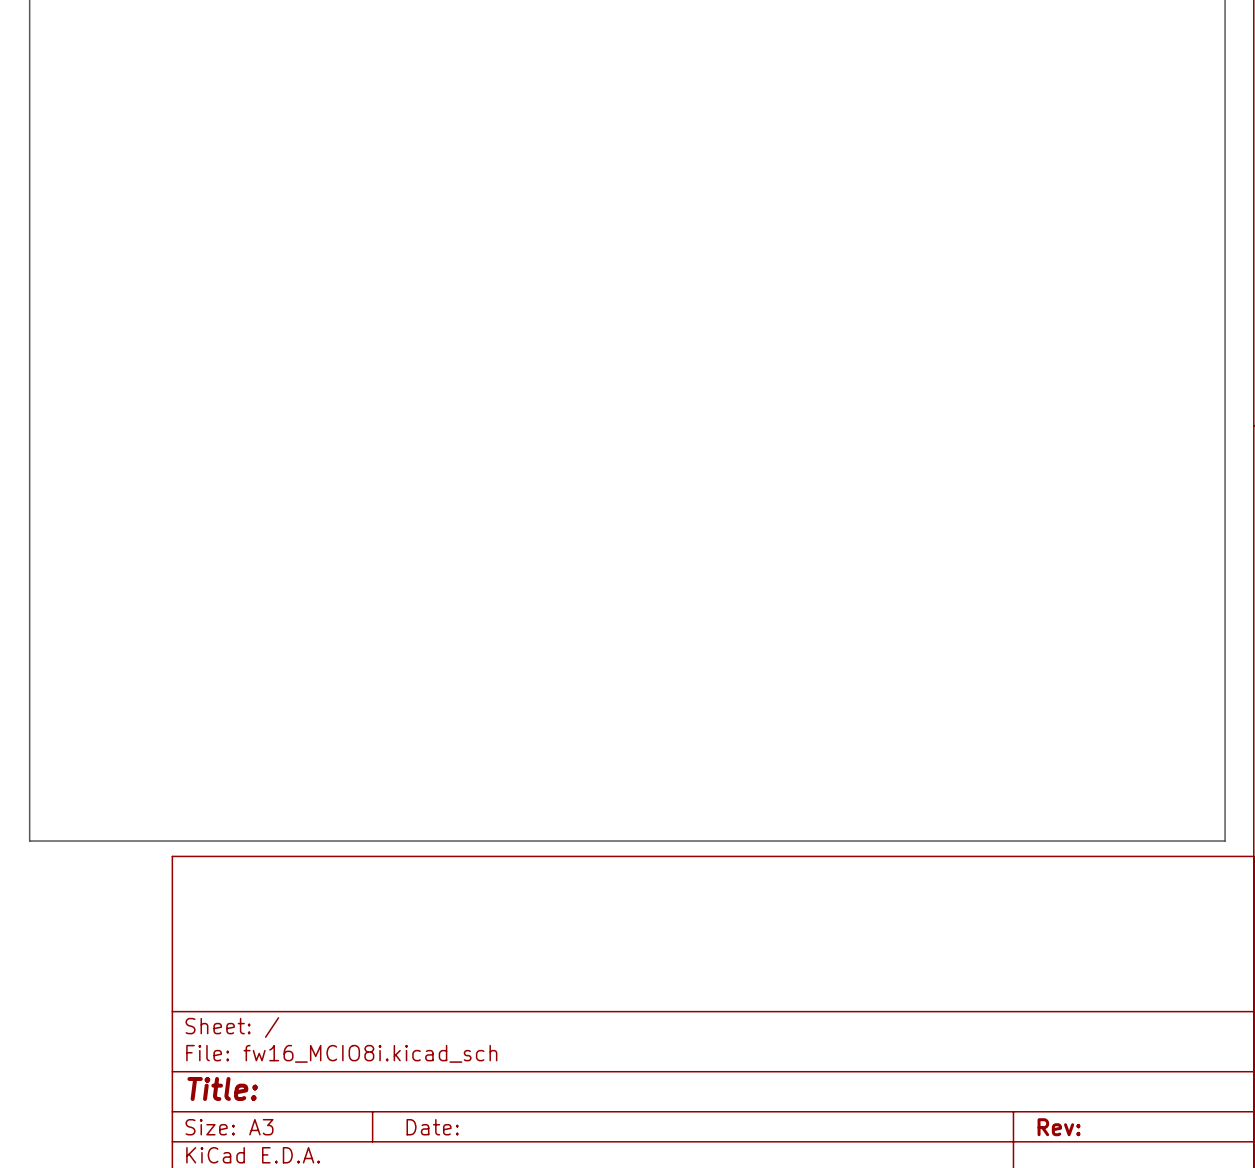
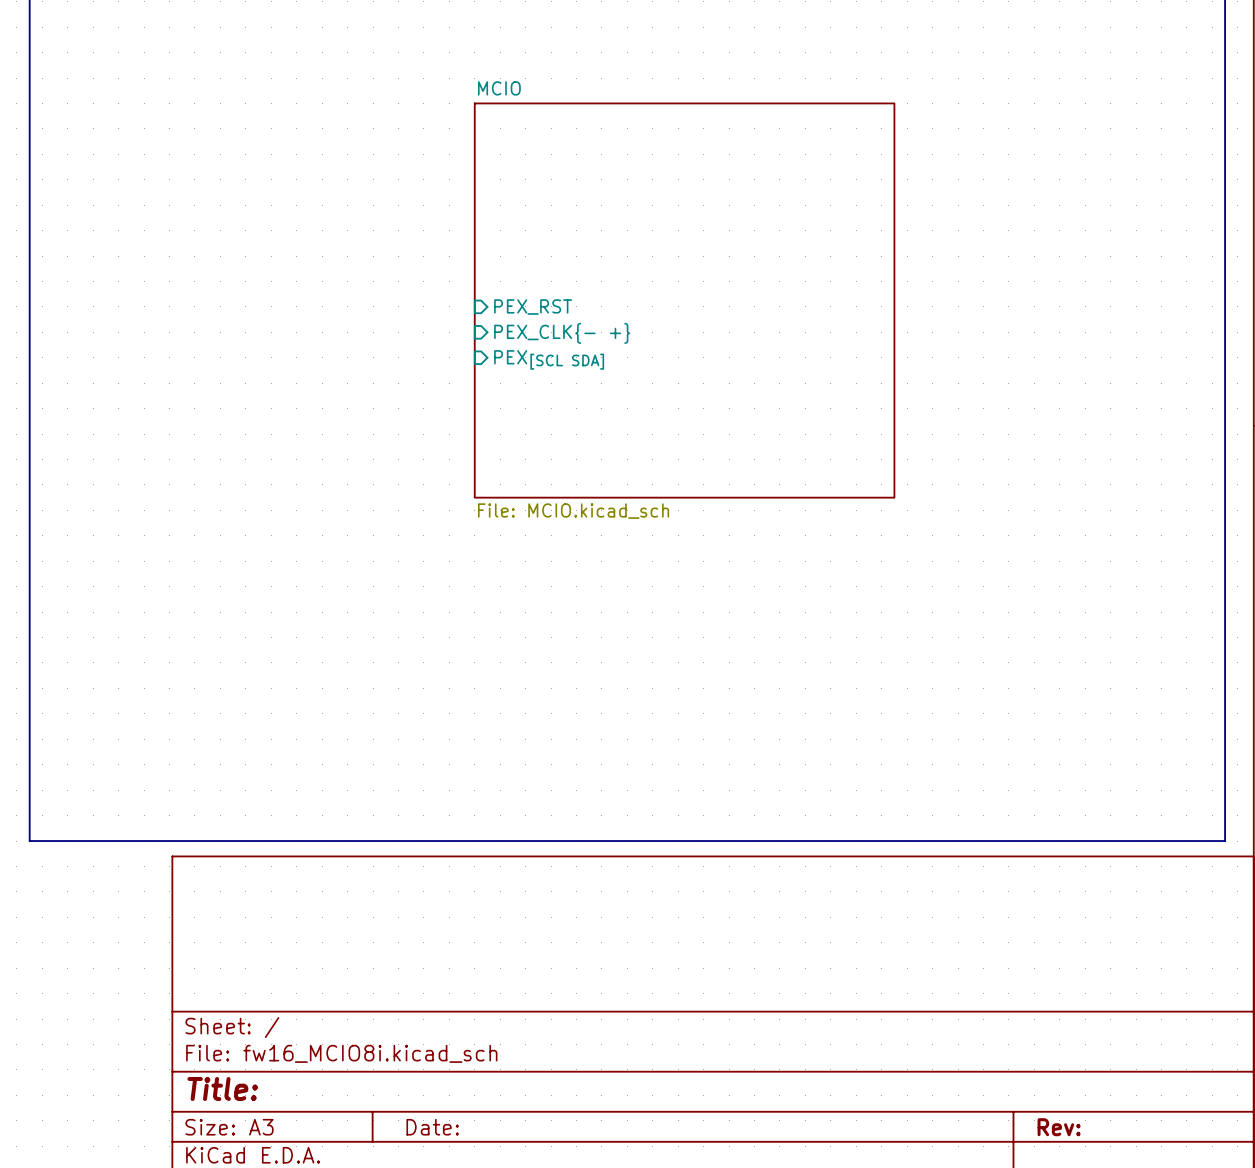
sheet MCIO: none -> File: MCIO.kicad_sch (684, 300)
sheet pin: none -> PEX_RST (533, 307)
sheet pin: none -> PEX_CLK{- +} (562, 333)
sheet pin: none -> PEX[SCL SDA] (549, 359)

